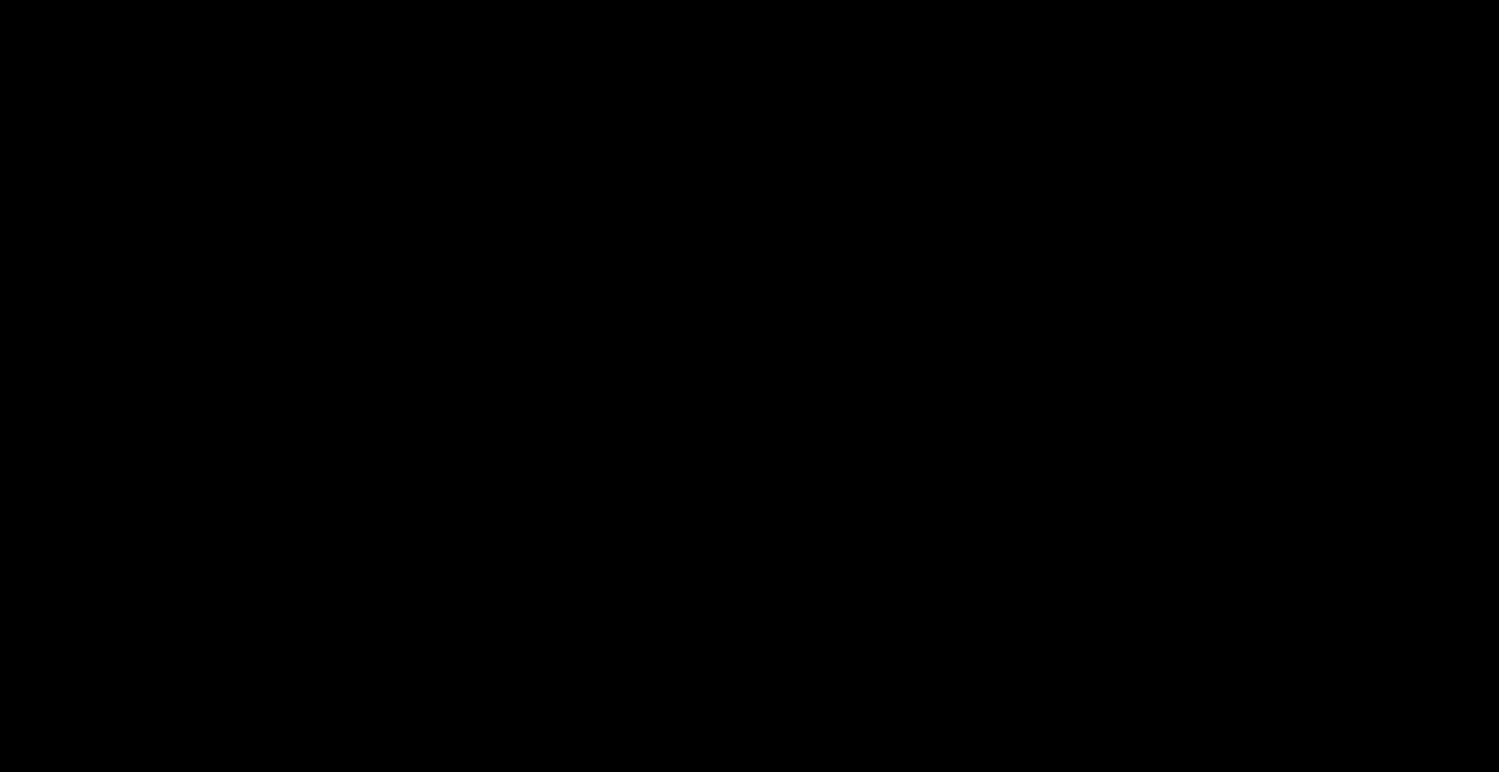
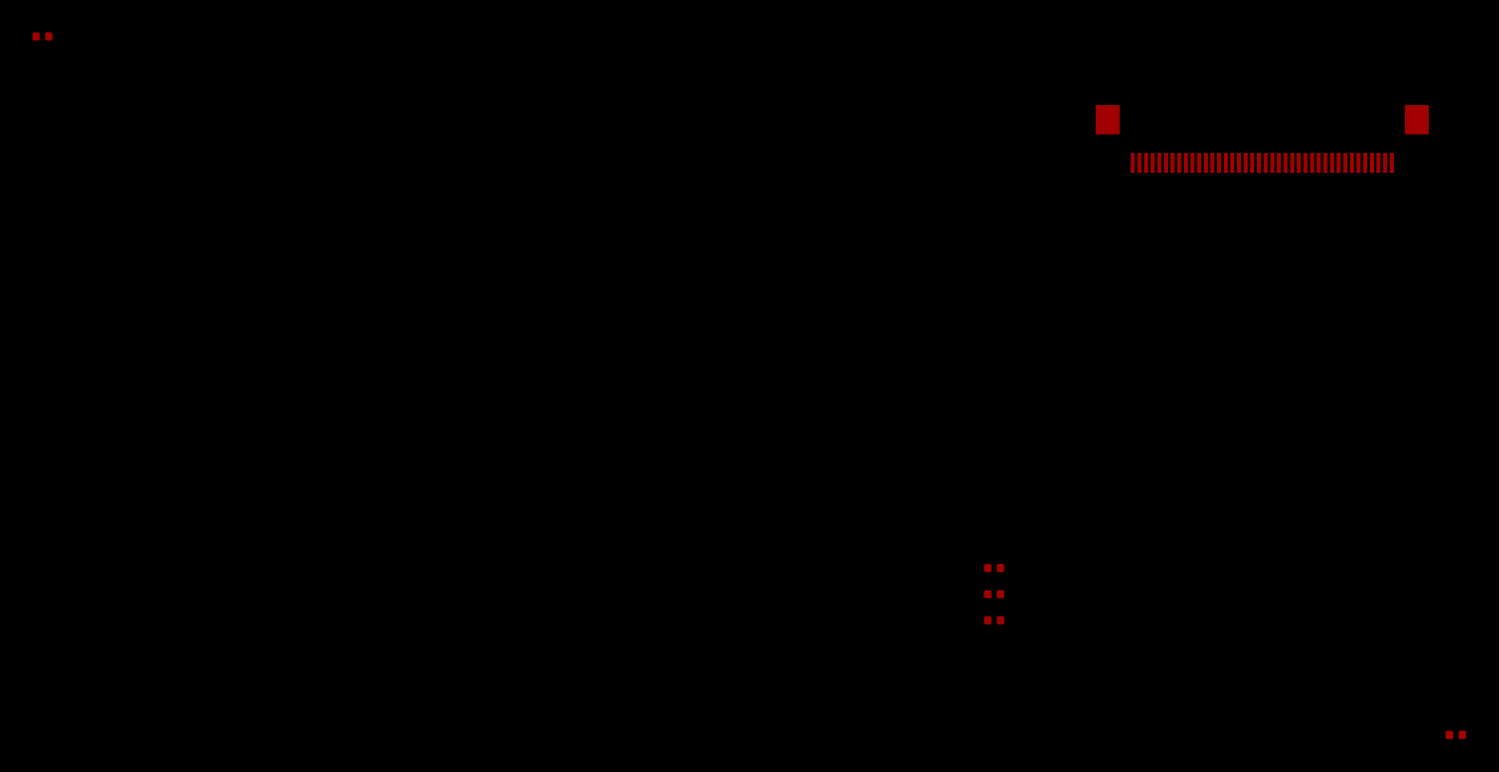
part: none -> (42, 36)
part: none -> (1262, 138)
part: none -> (994, 568)
part: none -> (994, 594)
part: none -> (994, 620)
part: none -> (1455, 734)

